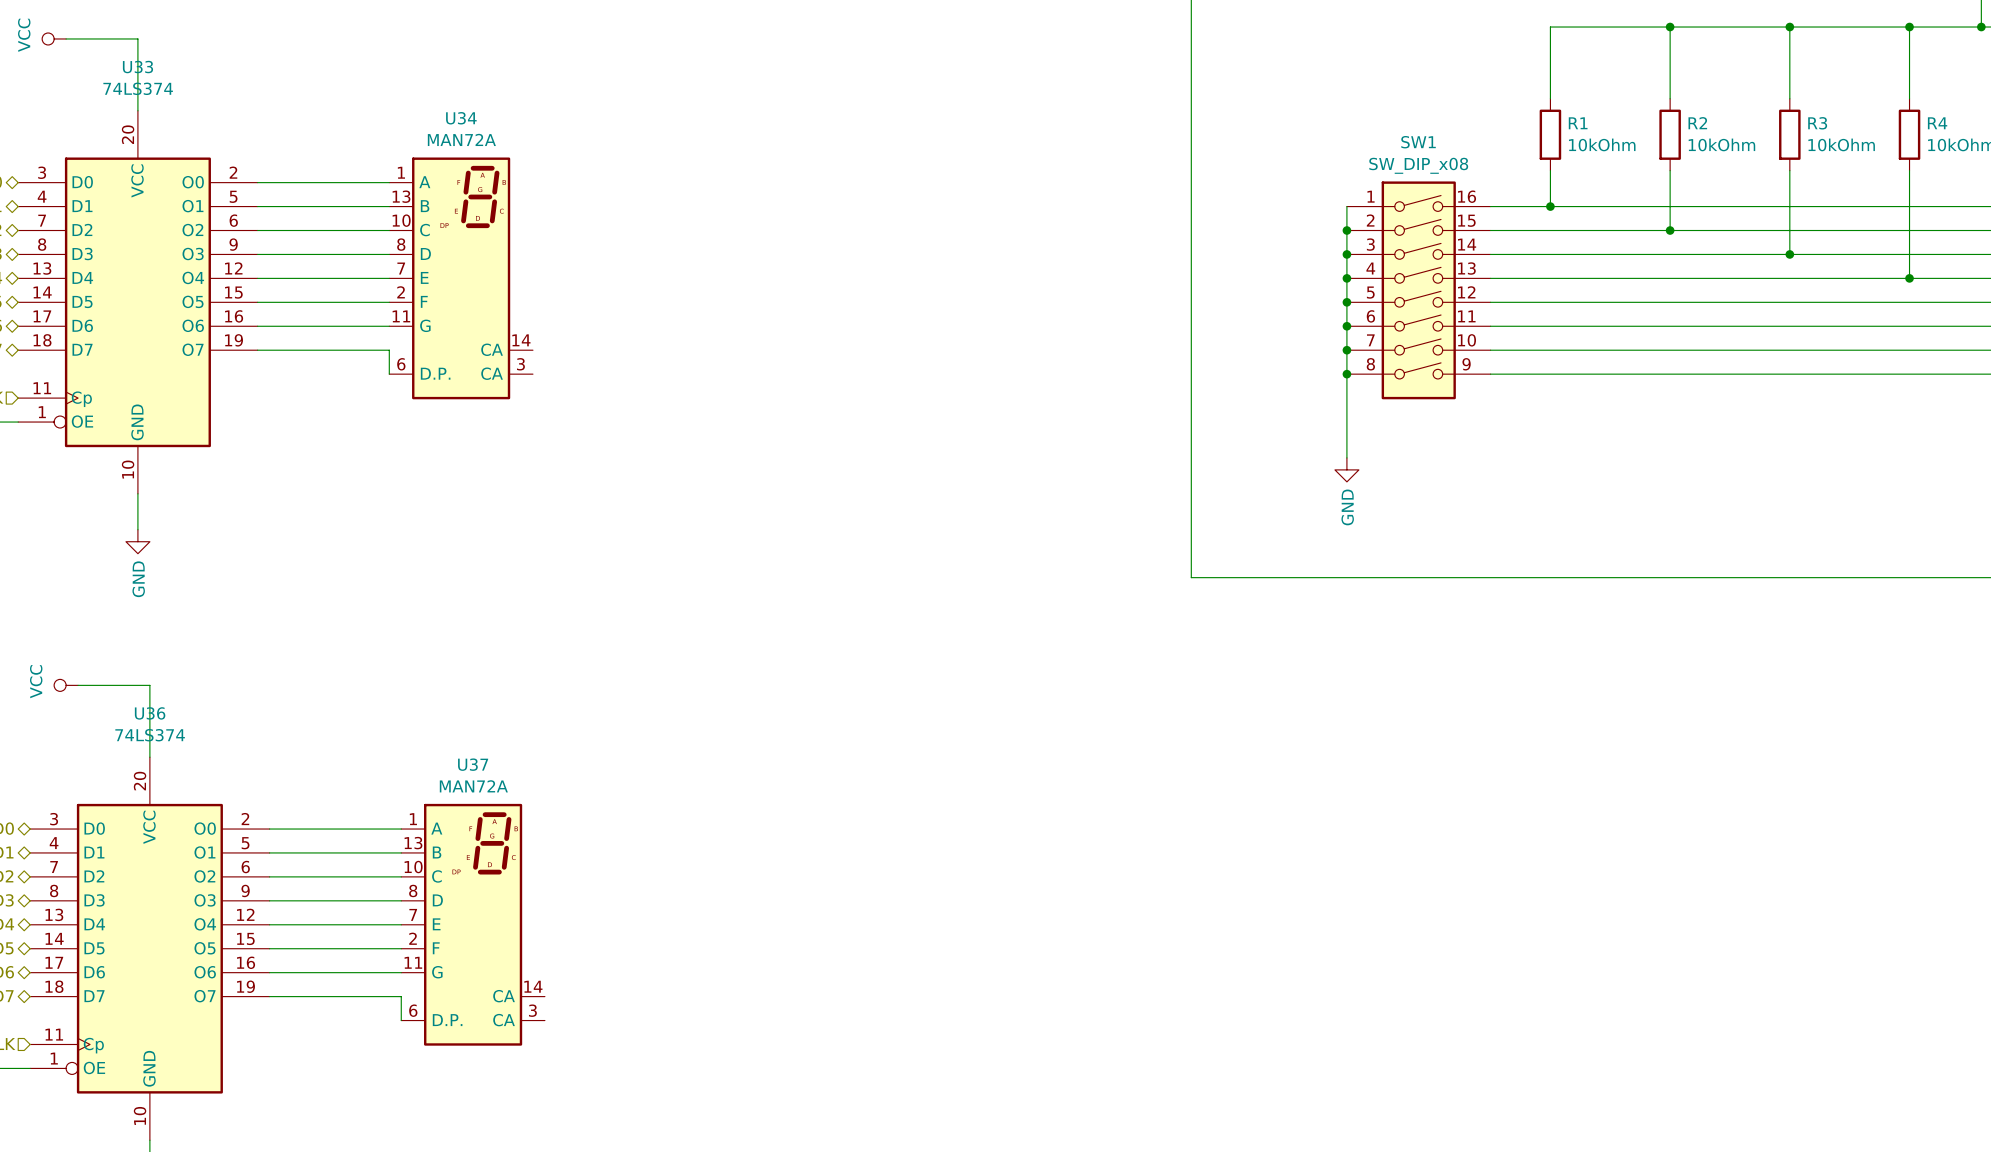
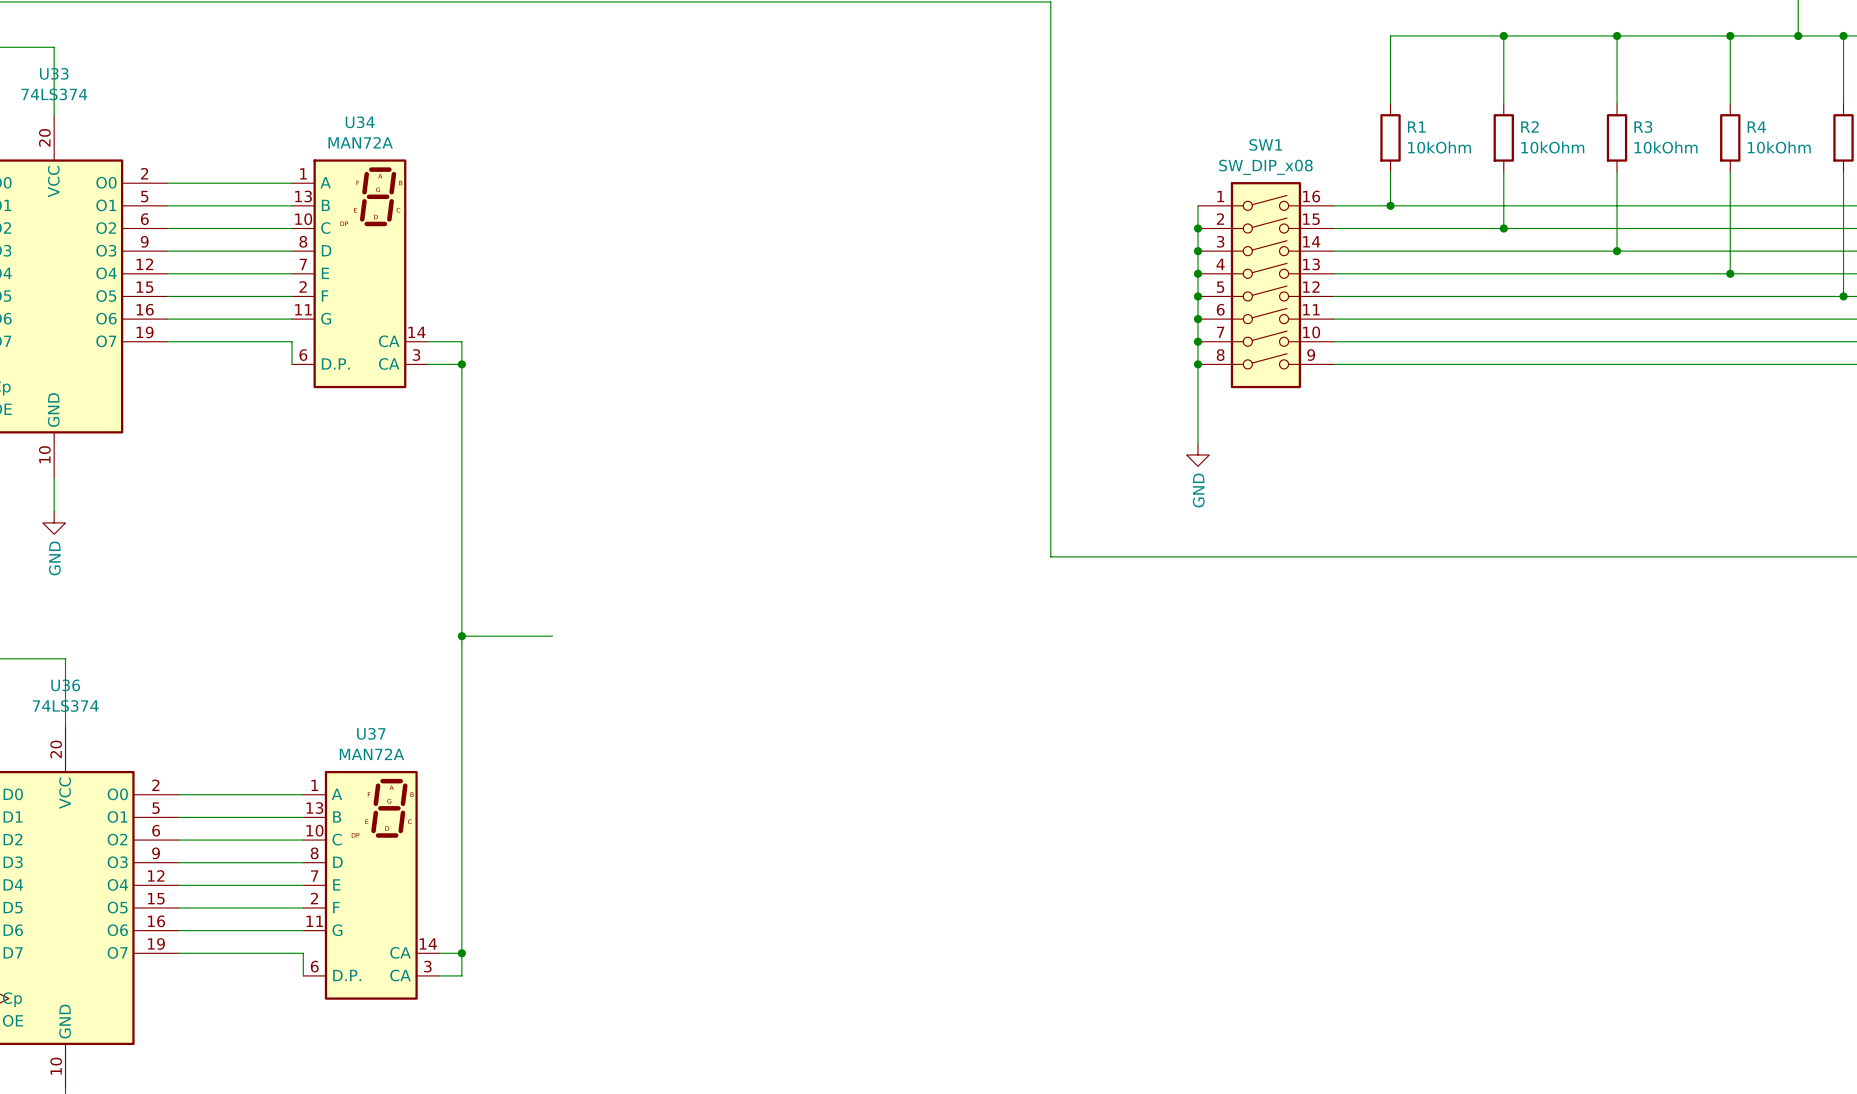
wire: none -> (427, 341) (461, 341) (461, 975) (439, 975)
wire: none -> (427, 364) (461, 364)
junction: none -> (461, 364)
wire: none -> (461, 636) (552, 636)
junction: none -> (461, 636)
wire: none -> (439, 953) (461, 953)
junction: none -> (461, 953)

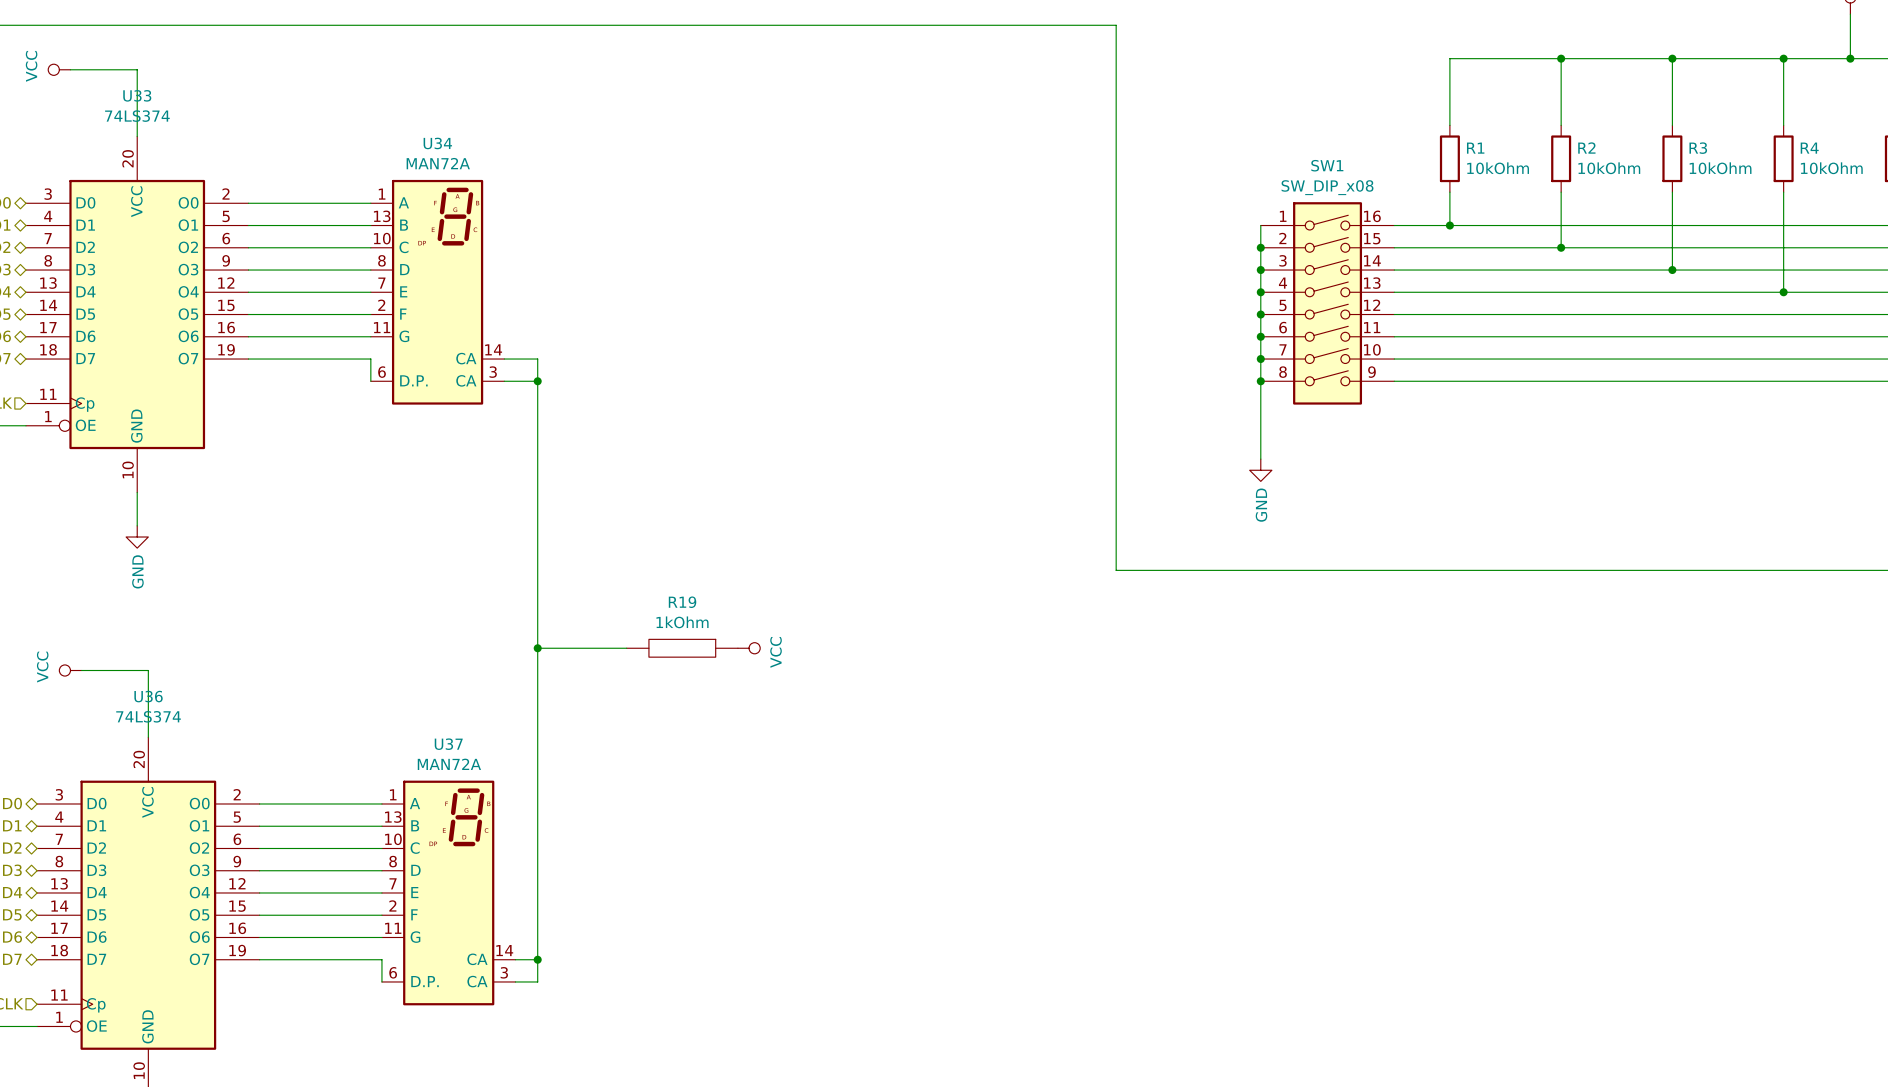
R19: none -> 1kOhm (682, 648)
power symbol: none -> VCC (749, 648)

